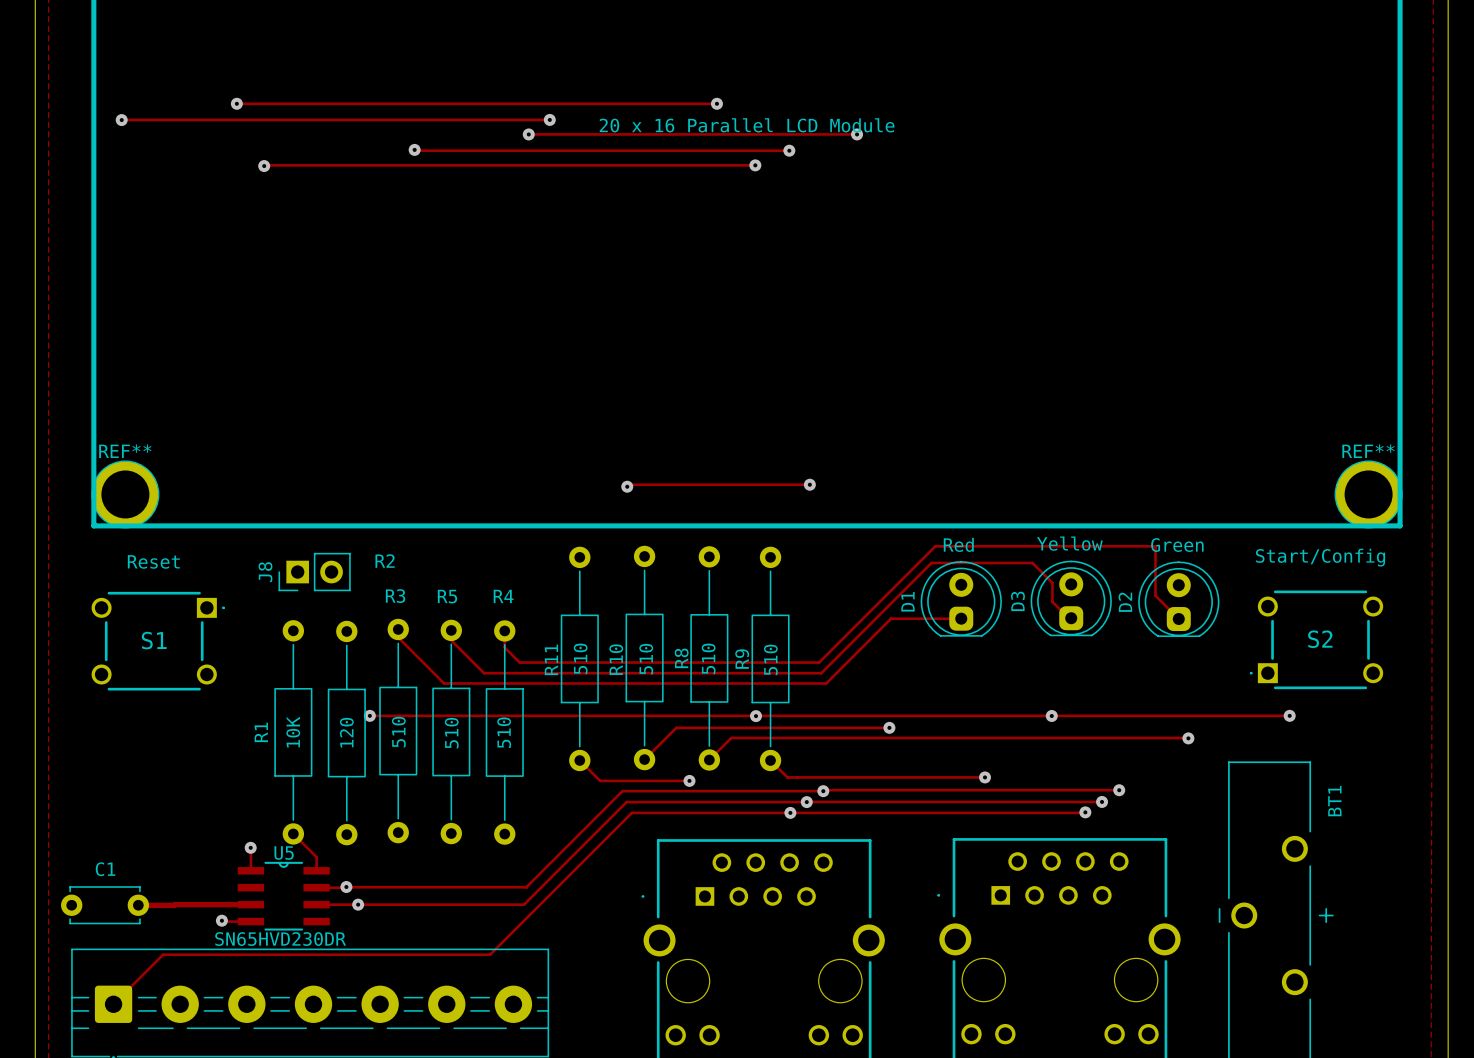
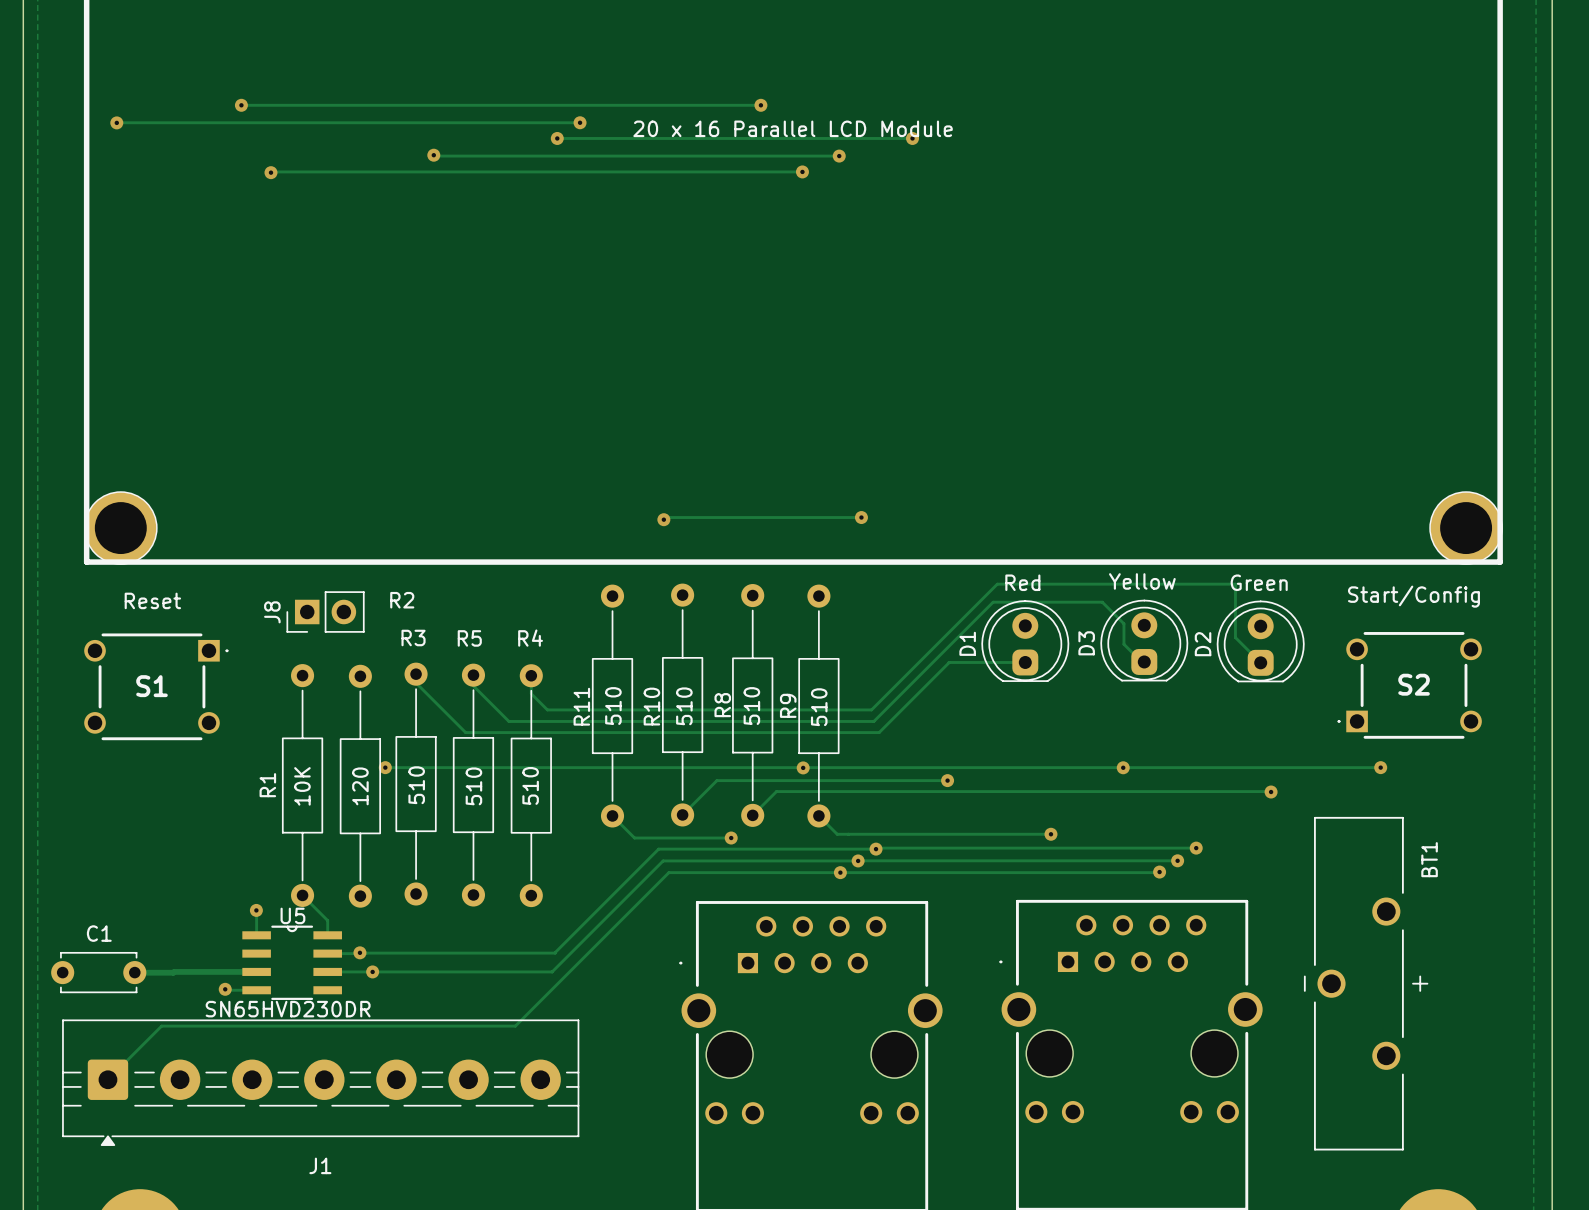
REF** name: REF** (125, 451) -> none
REF** name: REF** (1368, 451) -> none

